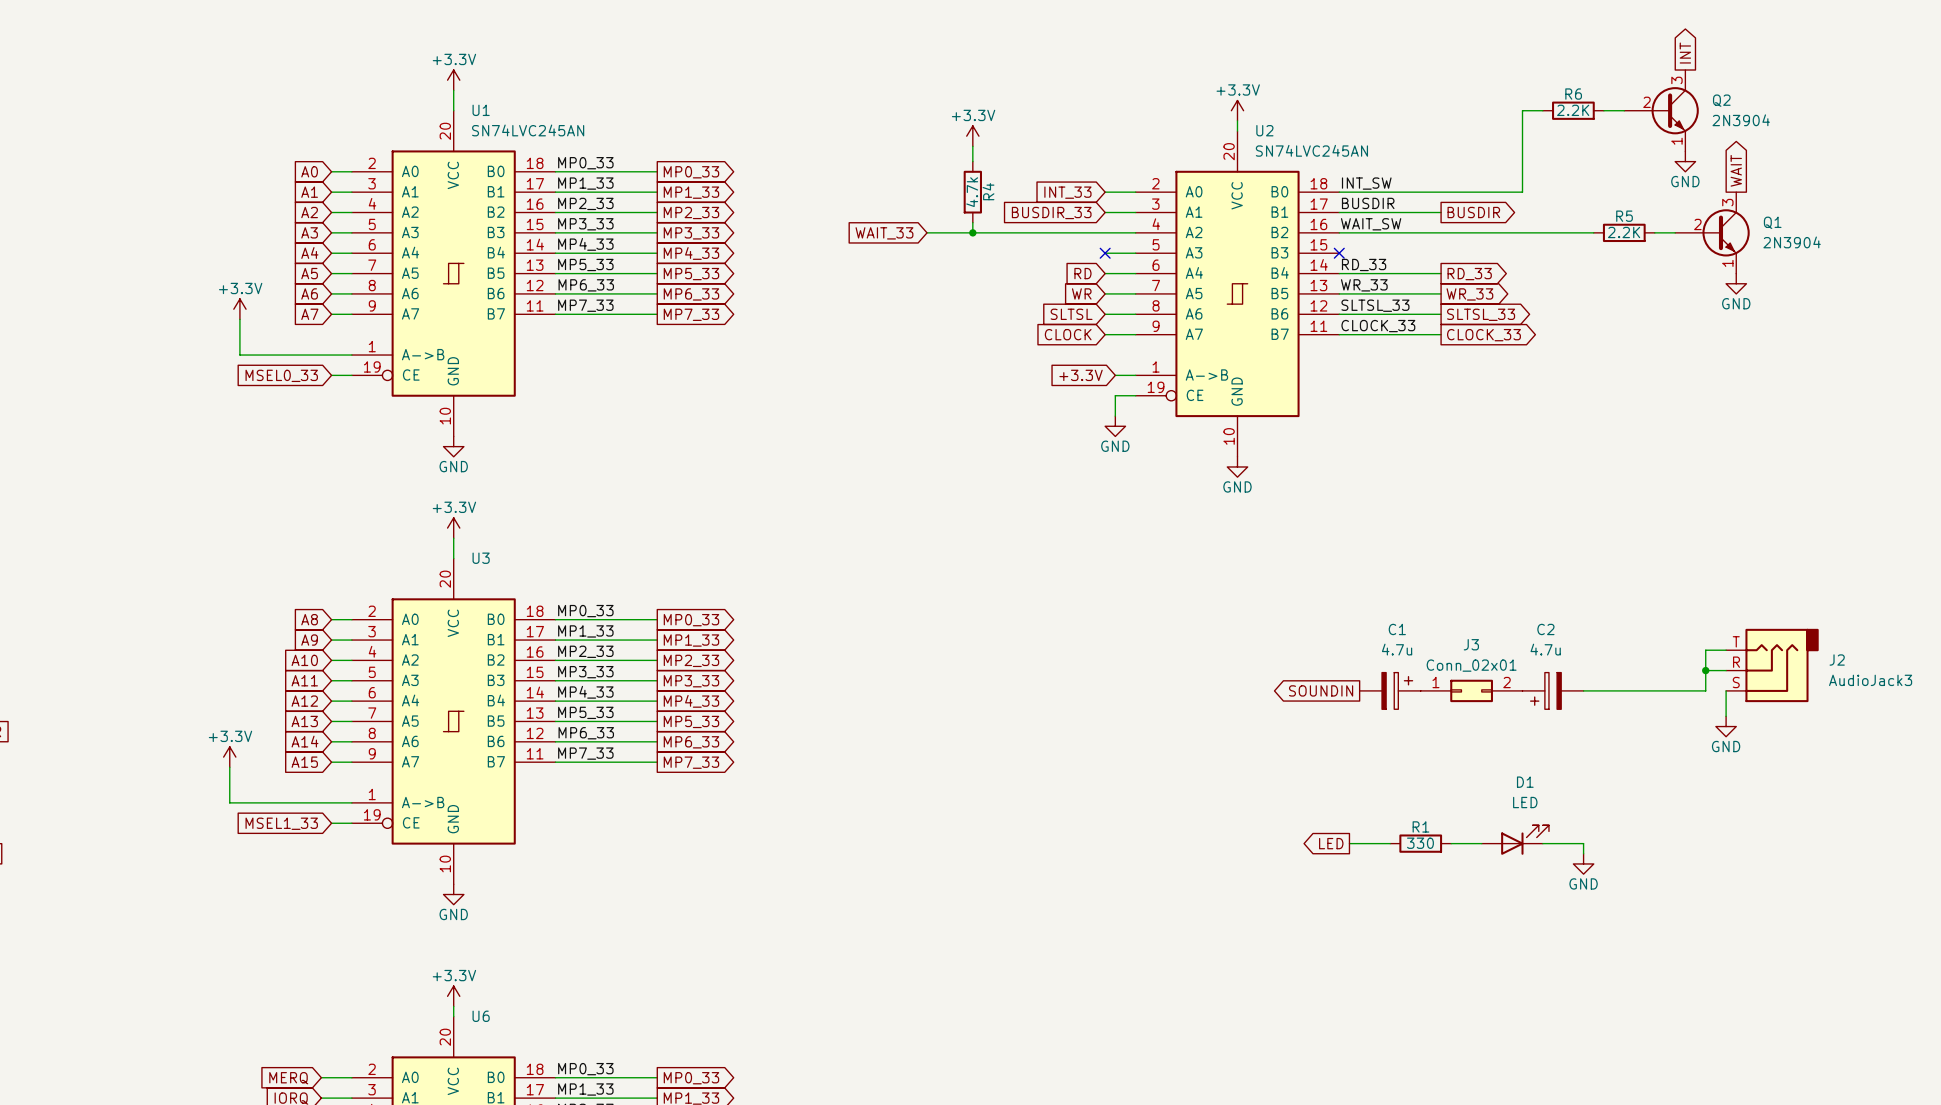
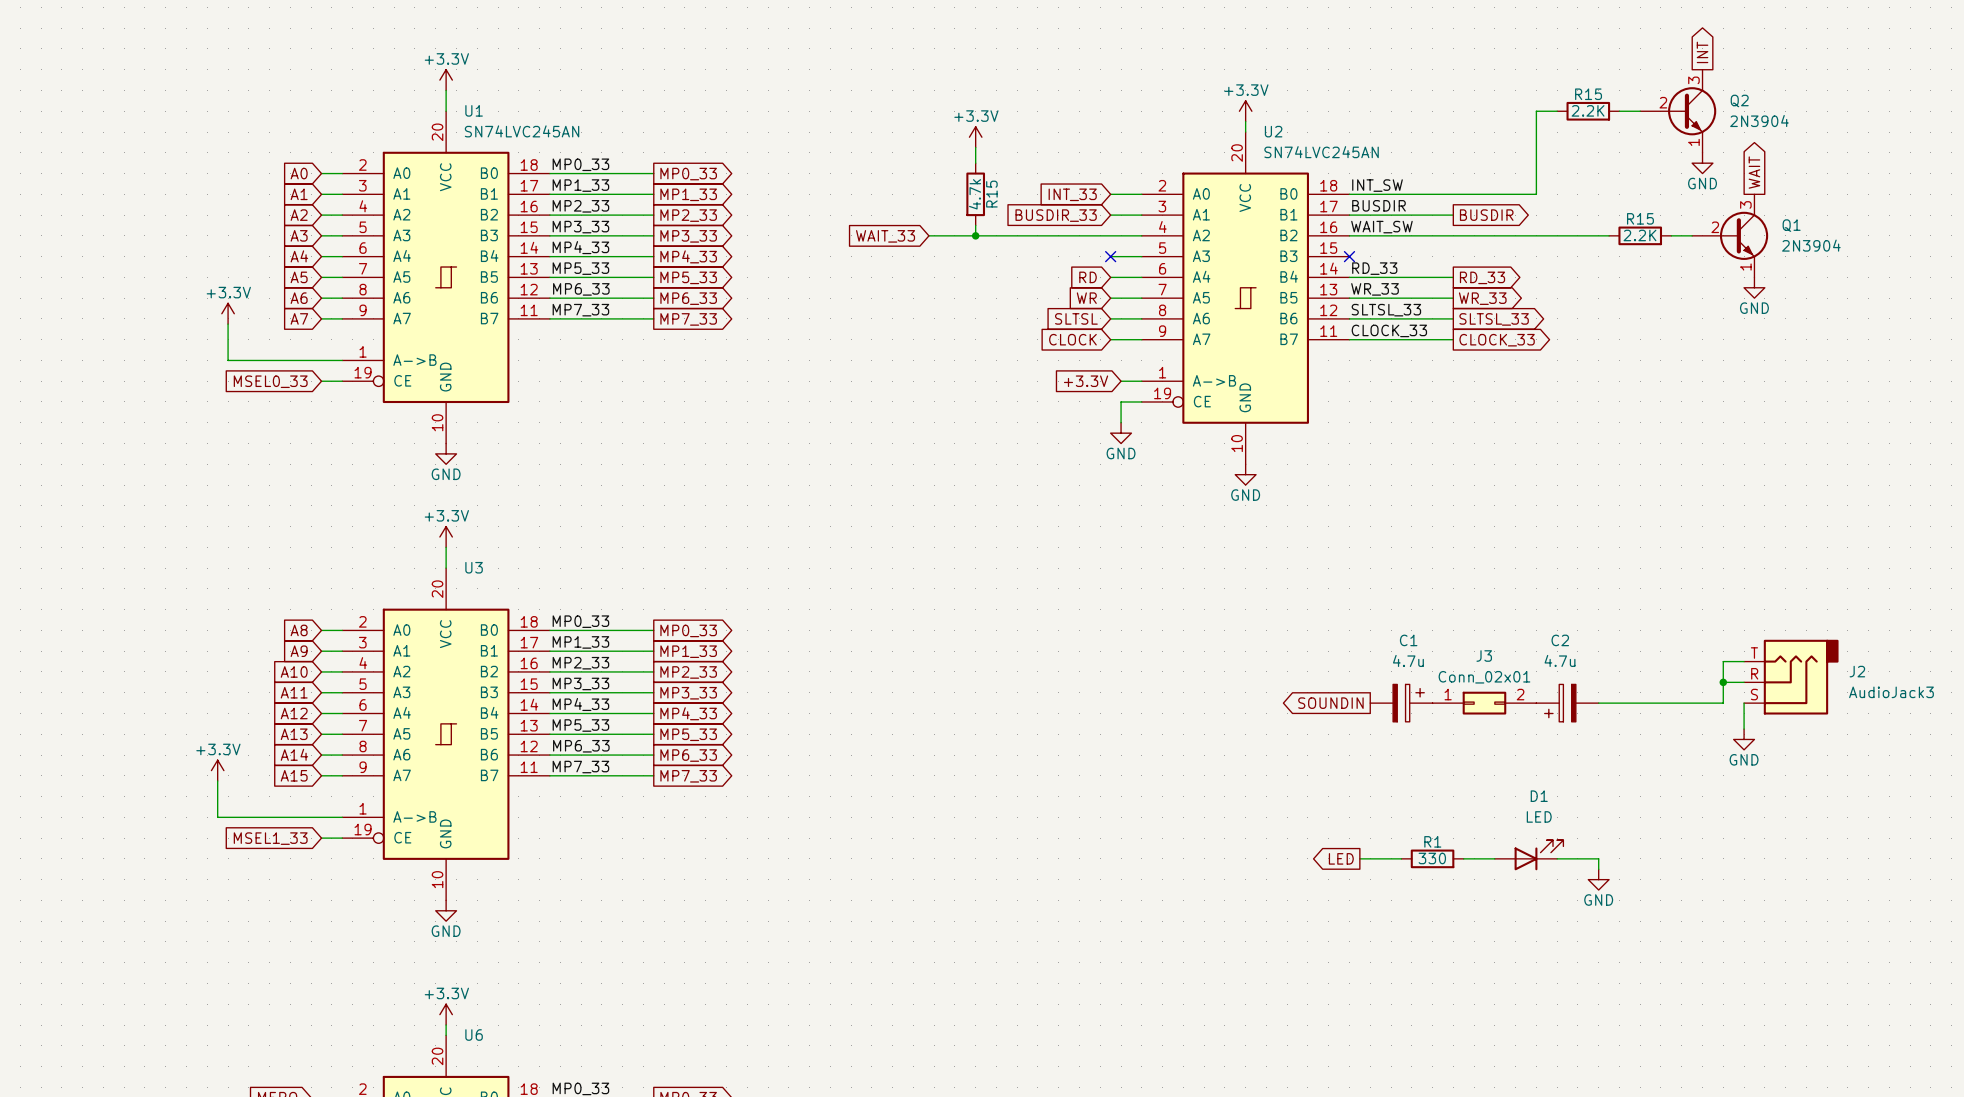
R6 name: R6 (1573, 94) -> R15 (1588, 94)
R4 name: R4 (988, 191) -> R15 (991, 194)
R5 name: R5 (1624, 216) -> R15 (1640, 218)

